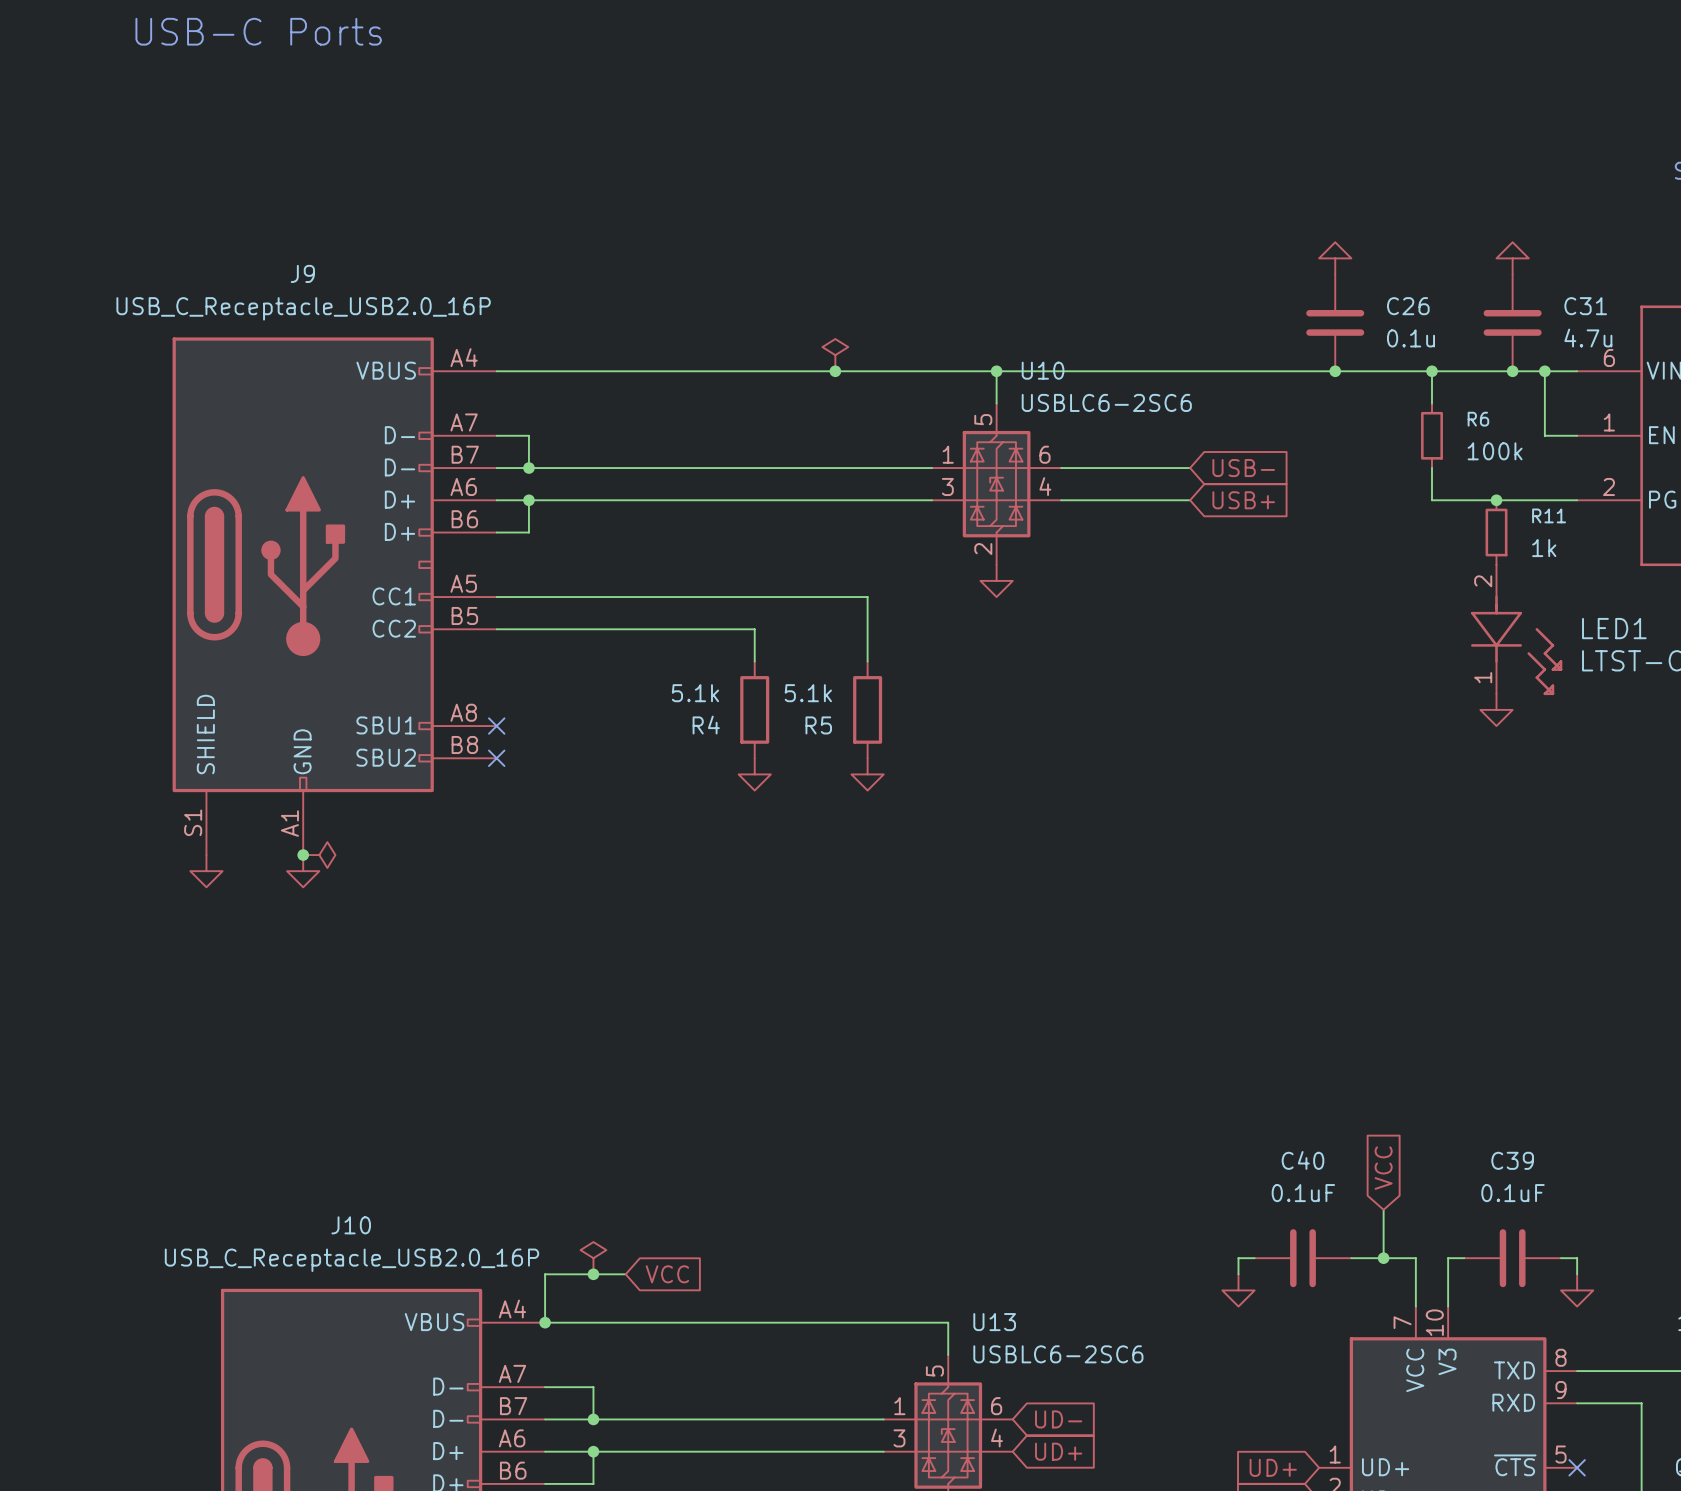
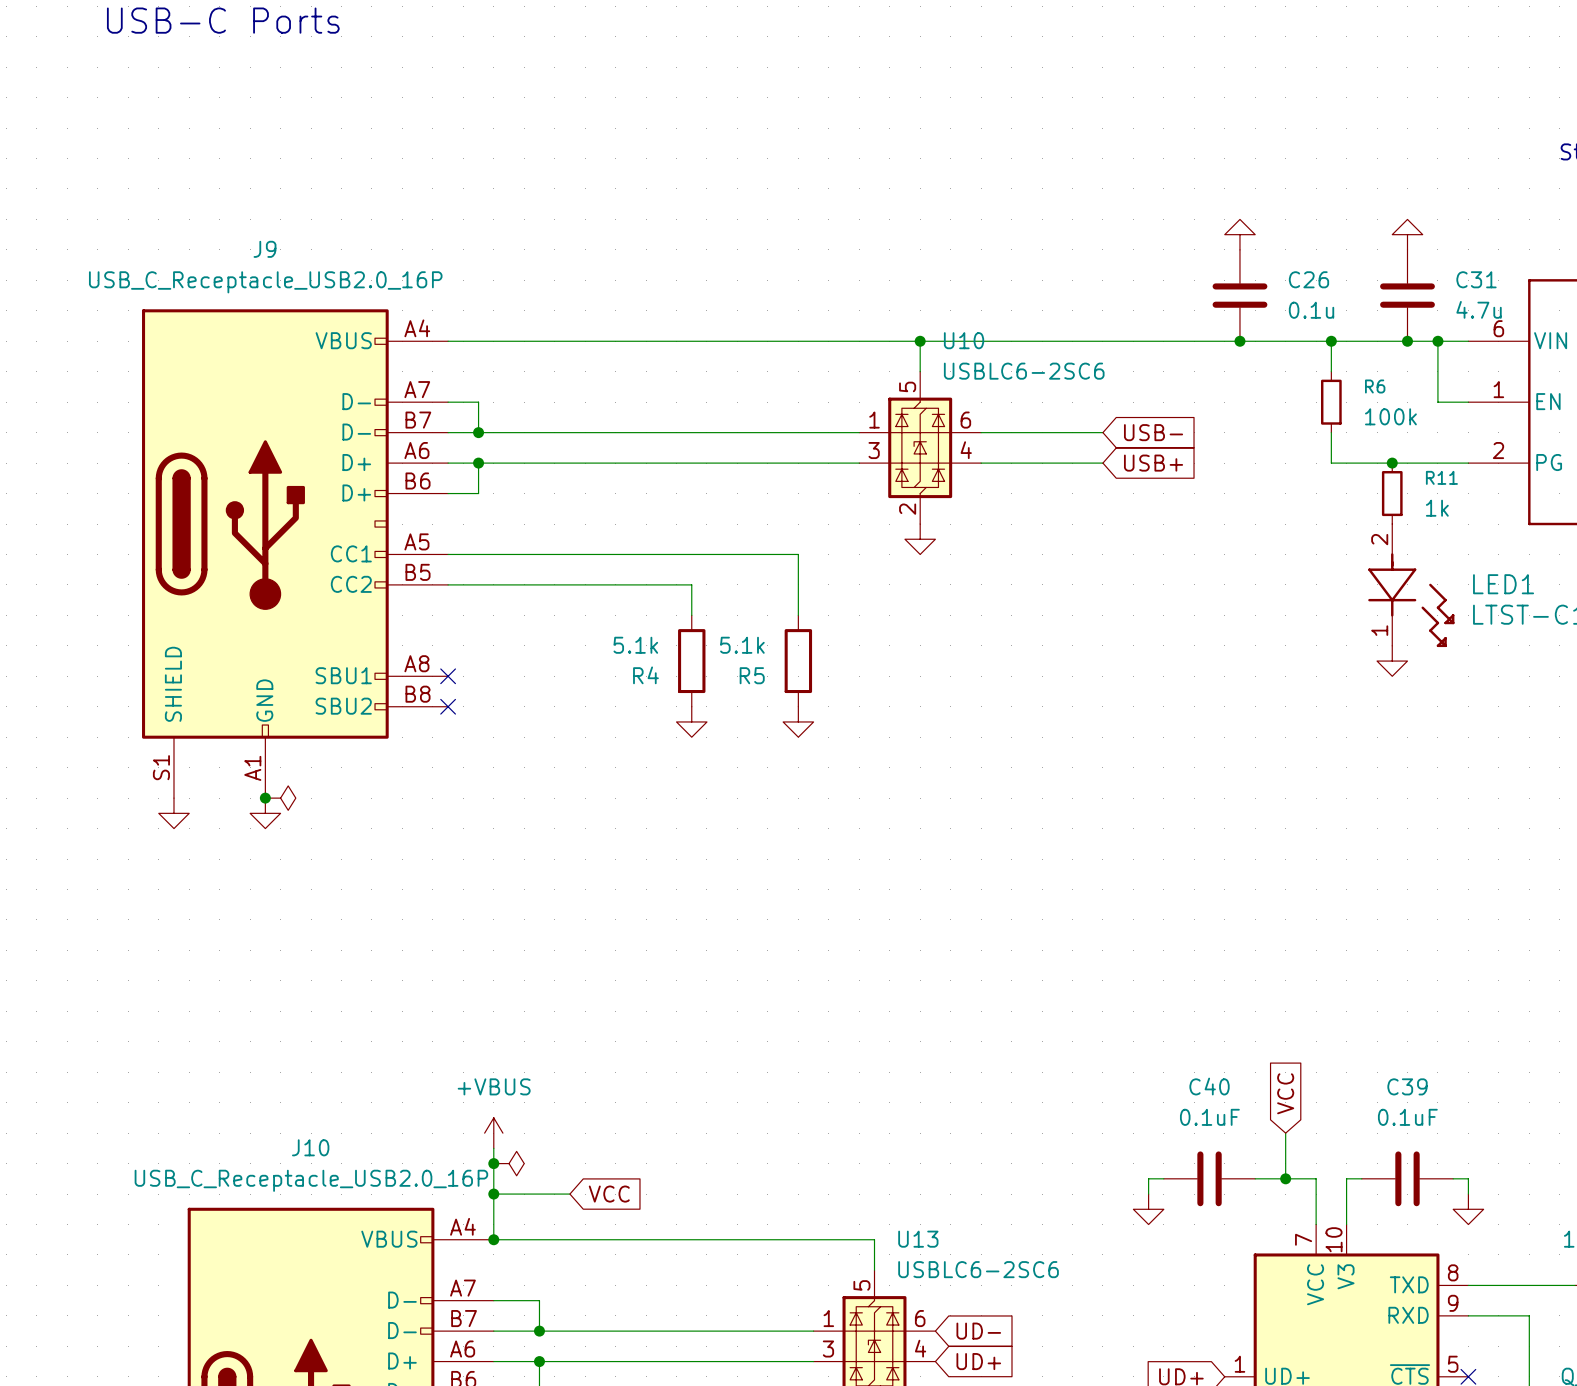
power symbol: (835, 355) -> none
junction: (835, 371) -> none
power symbol: none -> +VBUS (493, 1133)
wire: none -> (493, 1148) (493, 1194)
junction: none -> (493, 1163)
power symbol rotation: 0° (593, 1258) -> 90° clockwise (509, 1163)
power symbol position: (593, 1258) -> (509, 1163)
junction: none -> (493, 1194)
junction: (593, 1274) -> none

